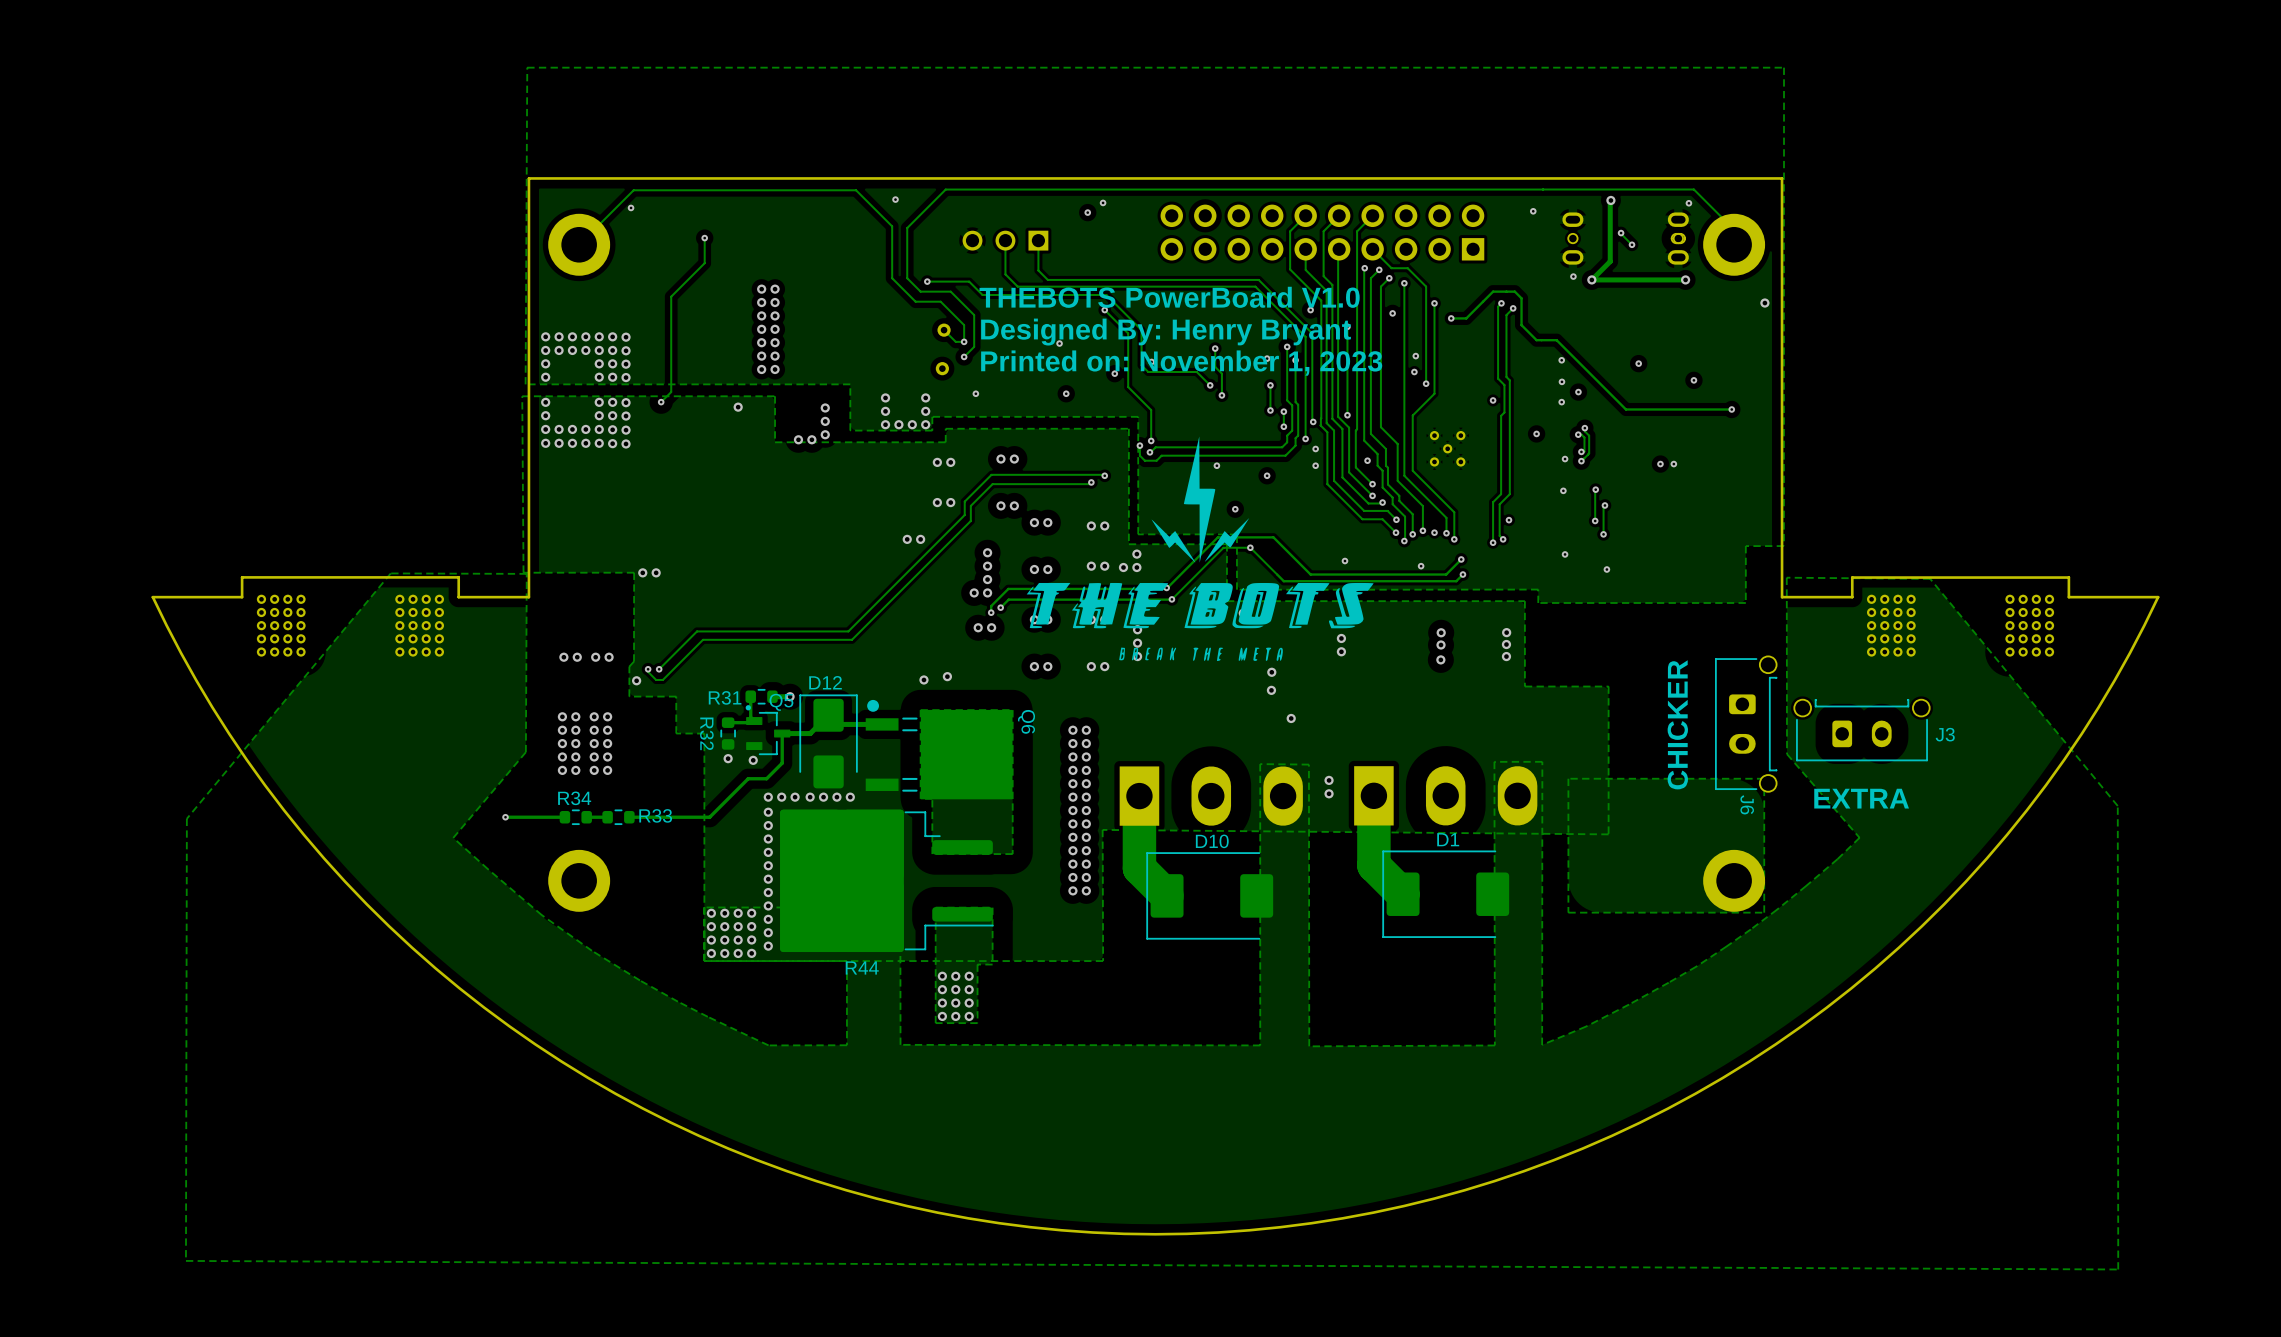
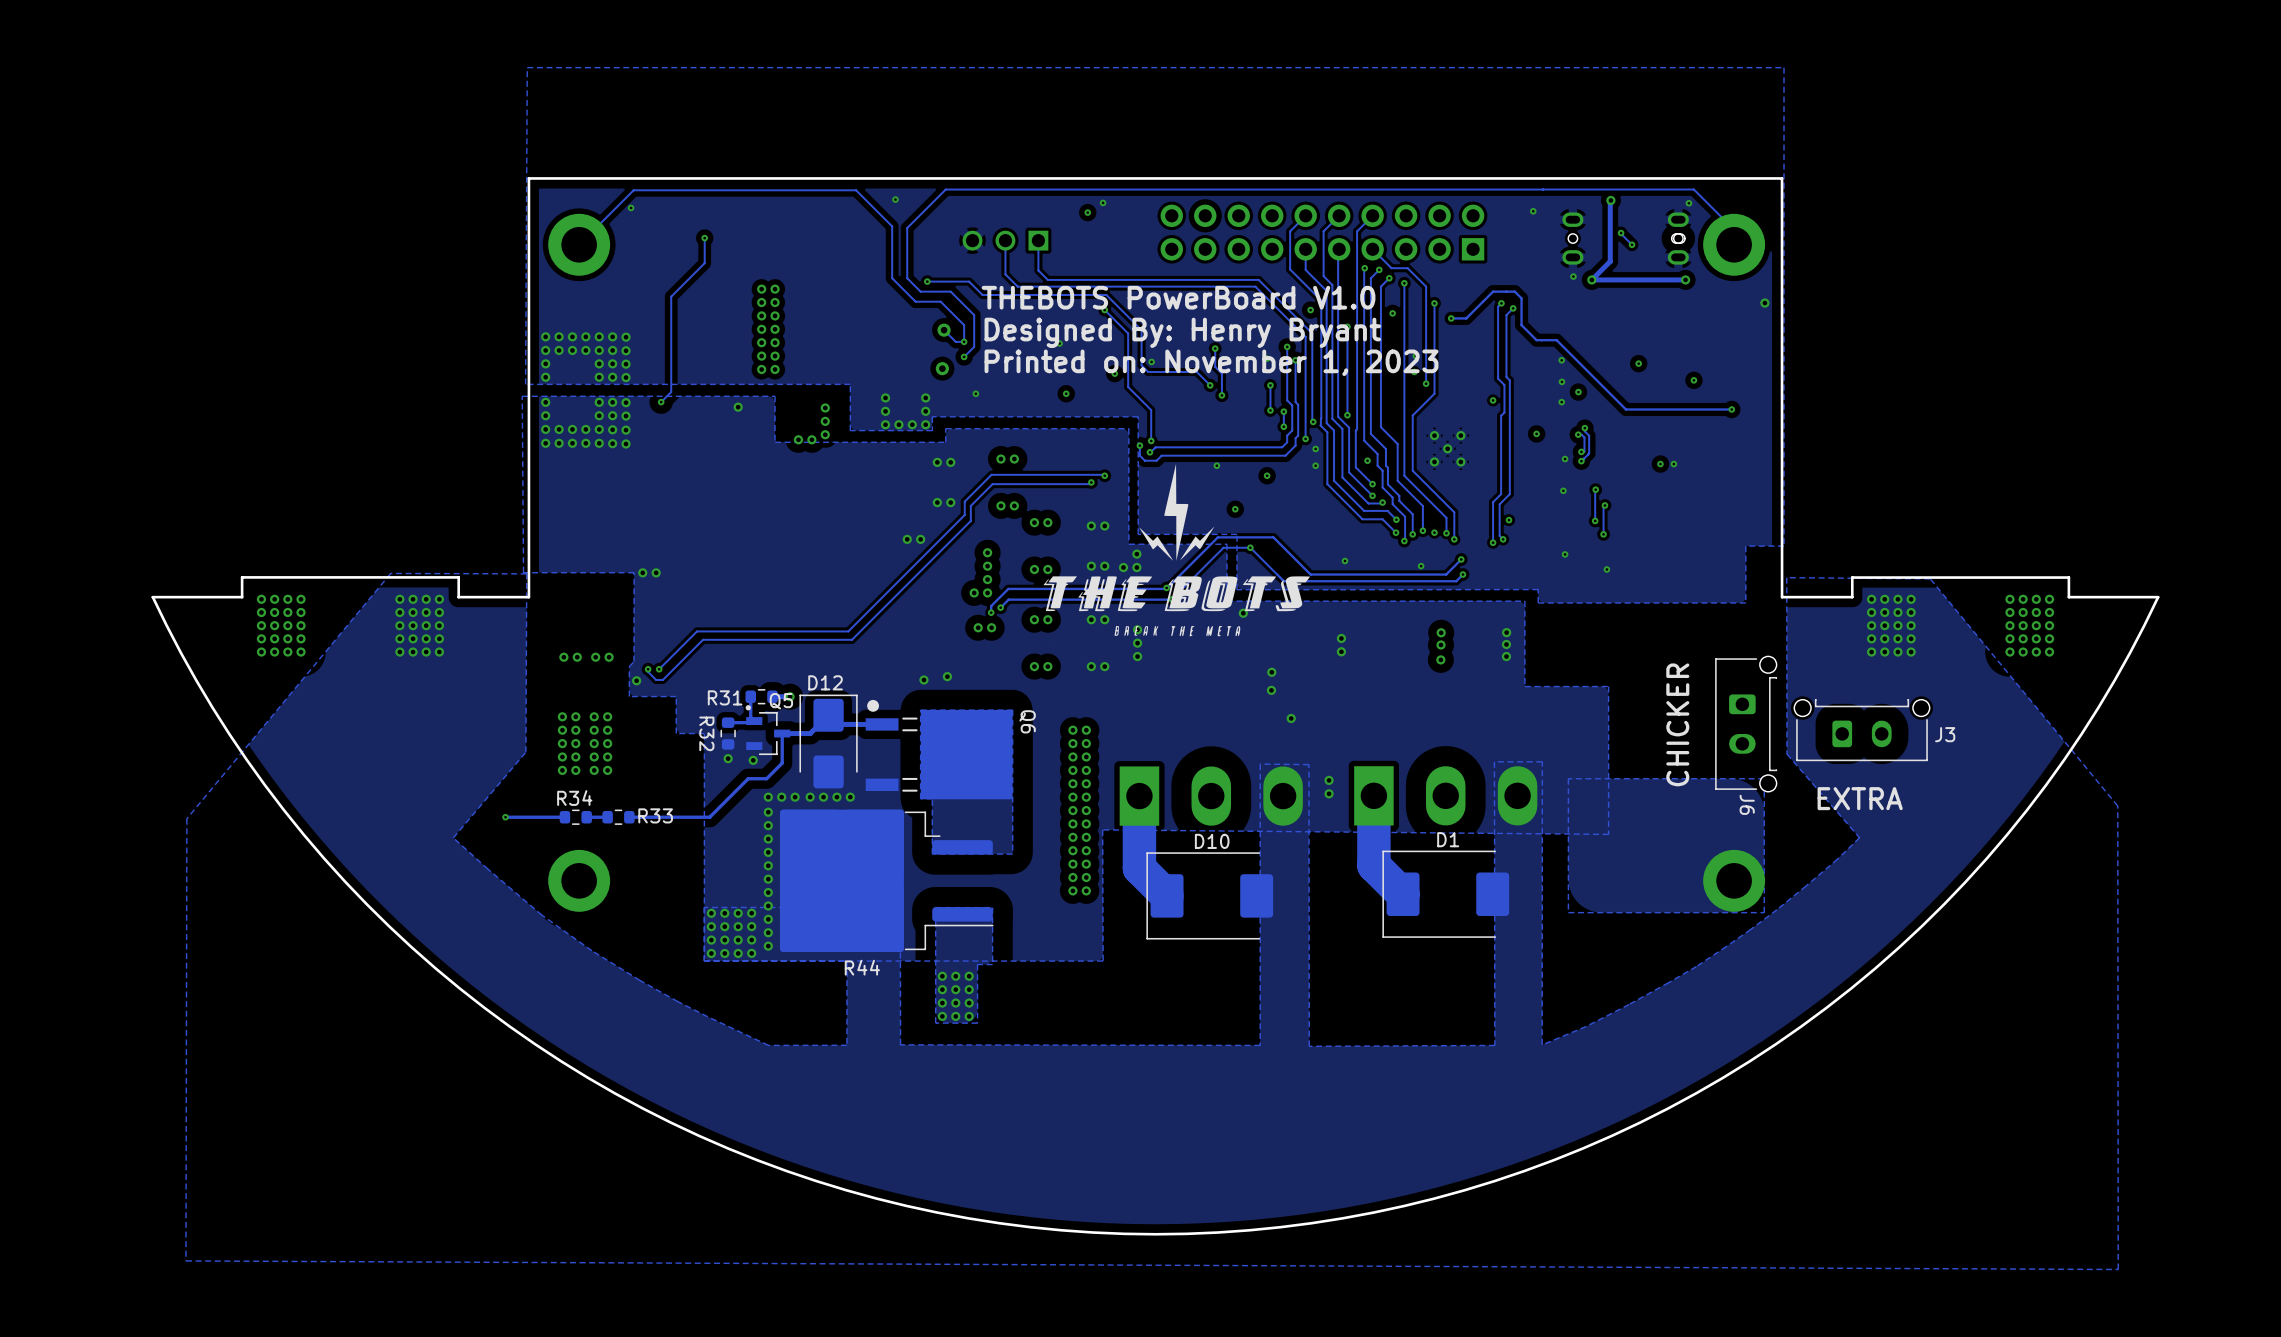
drawing: [1026, 436, 1374, 673] -> none
drawing: none -> [1043, 463, 1311, 646]

